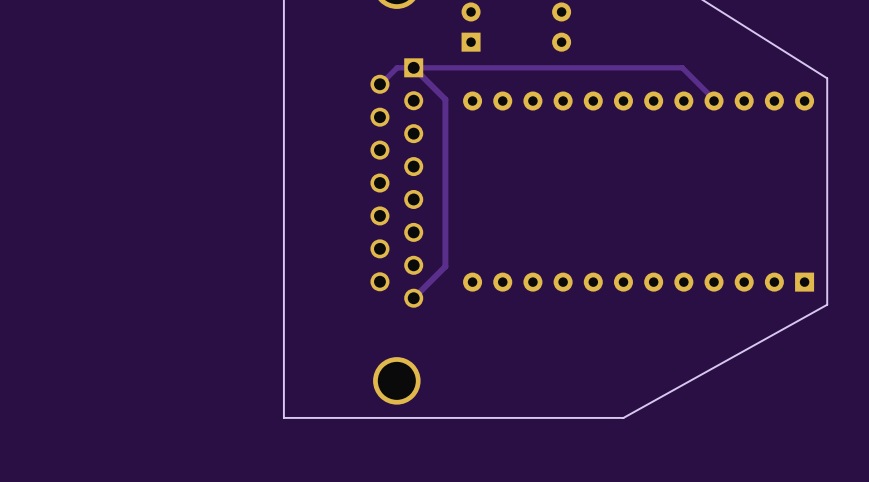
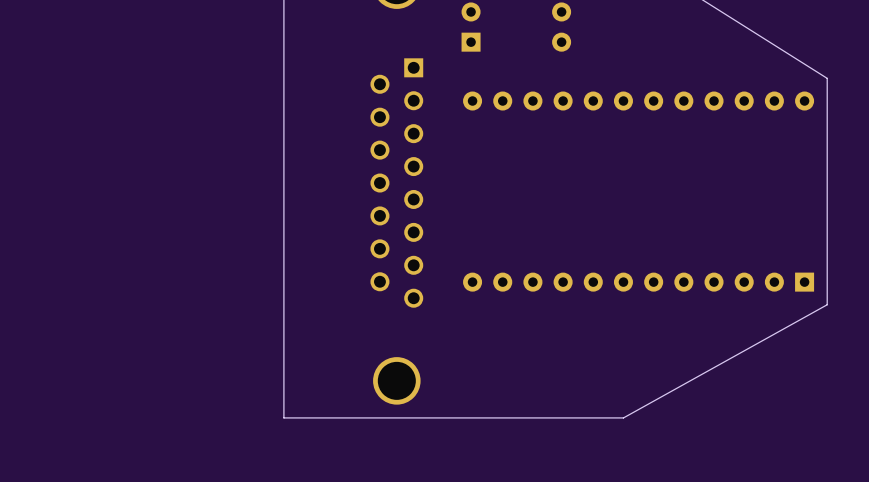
track: (413, 67) (445, 99) (445, 266) (413, 298) -> none
track: (379, 84) (397, 67) (682, 67) (715, 101) -> none

